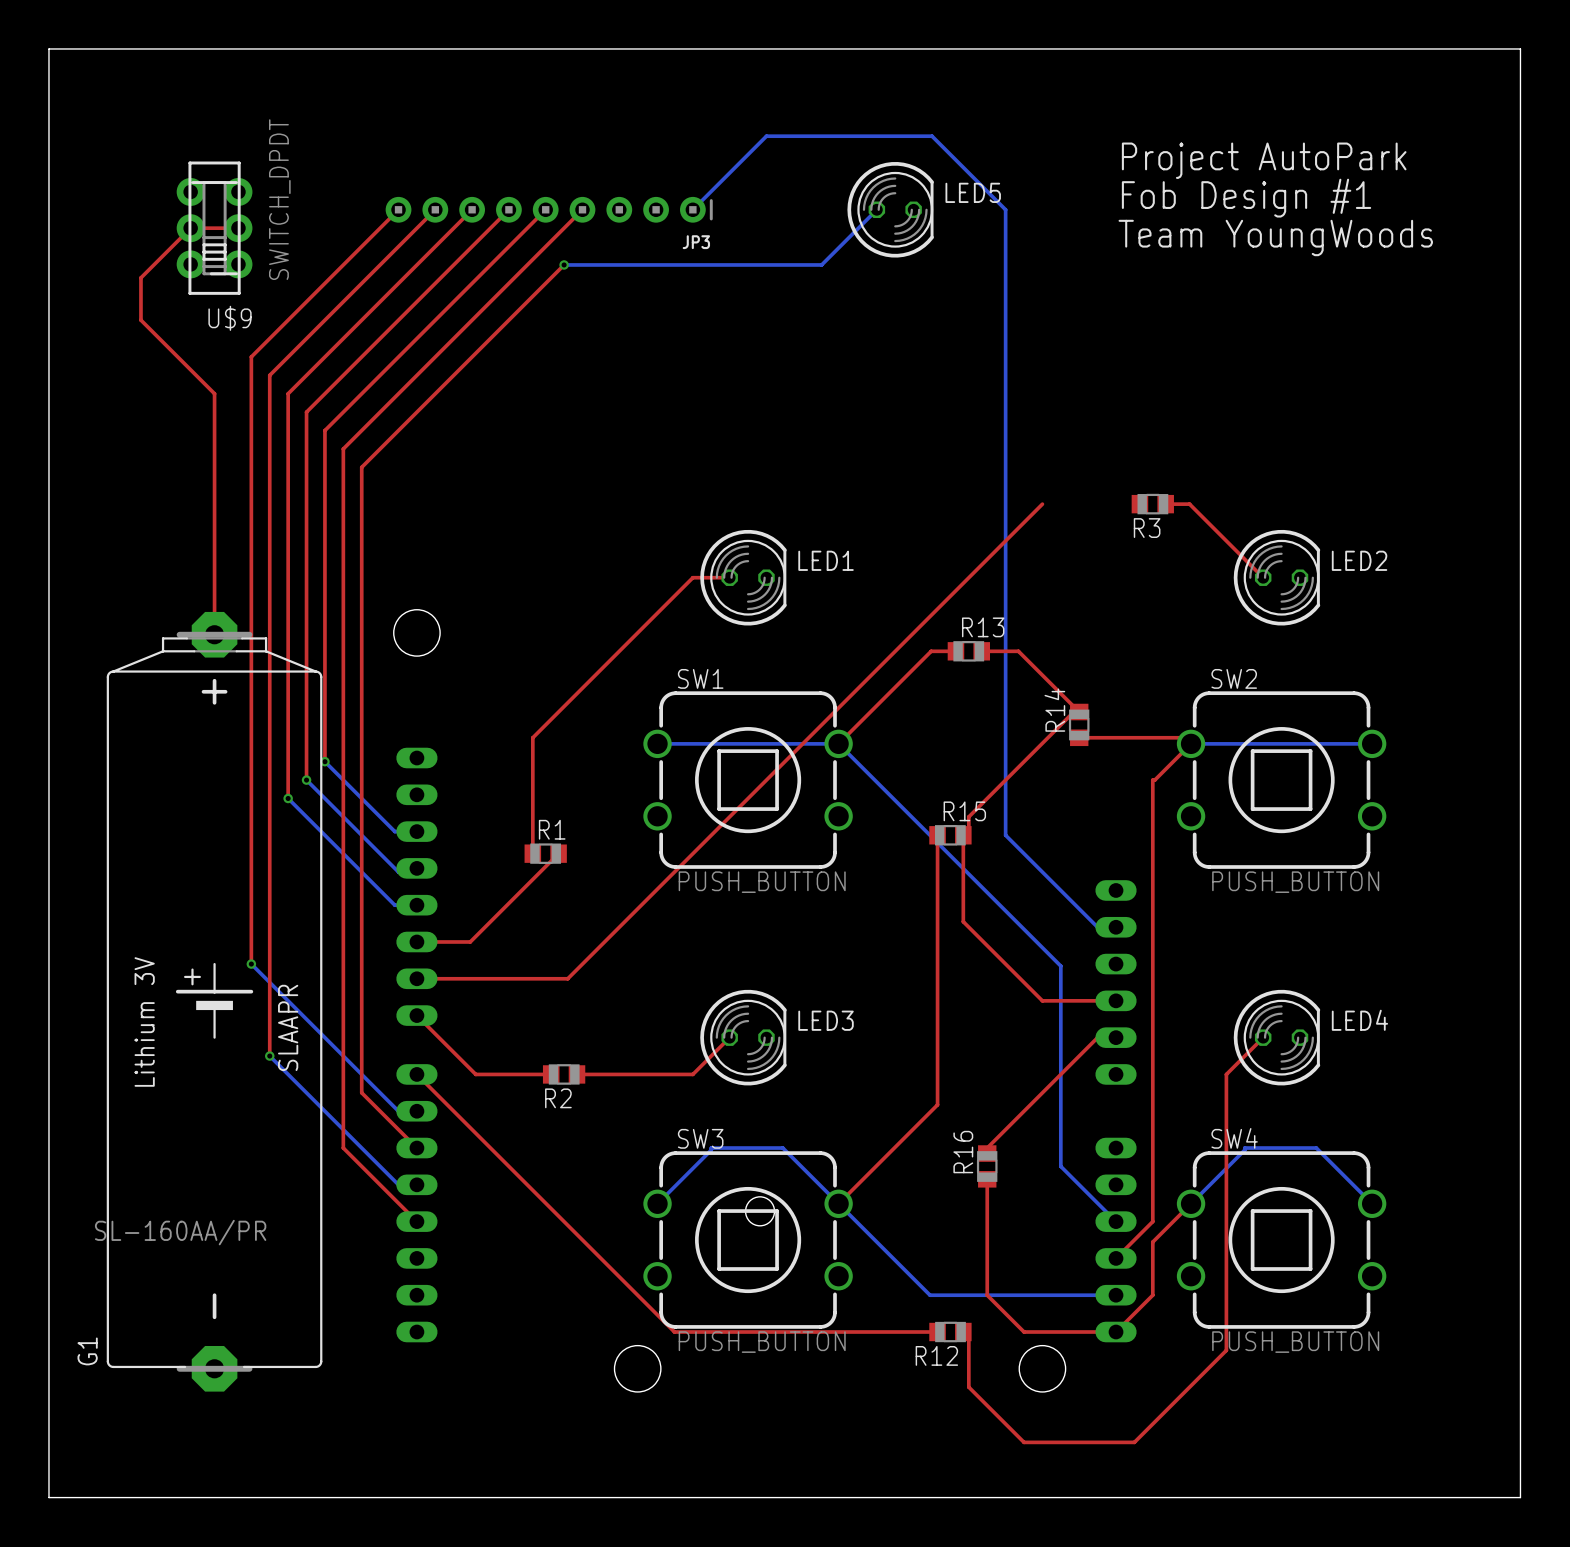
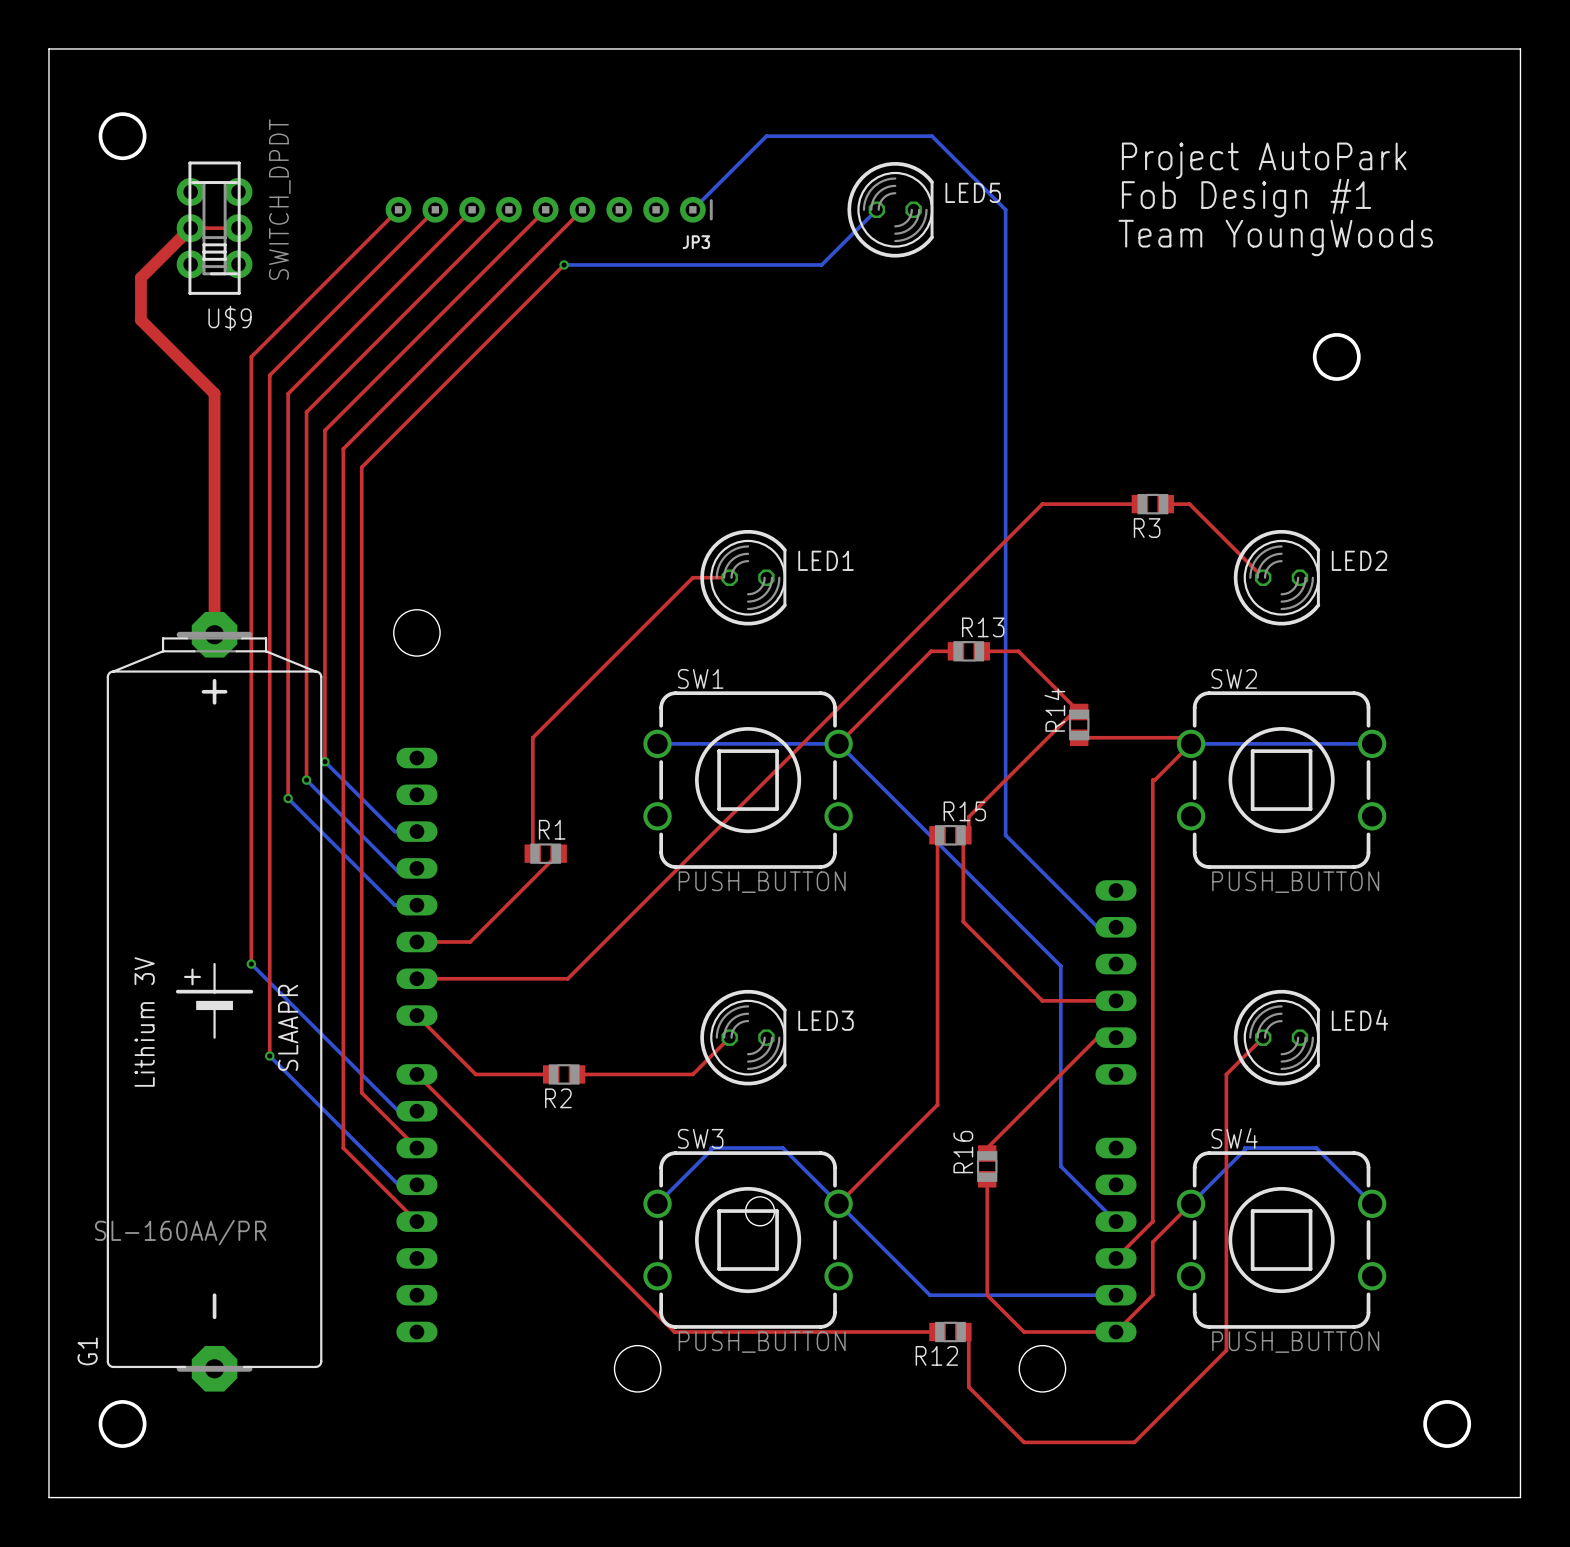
round board edge: none -> [98, 112, 147, 161]
top track width: thin (190, 228) (140, 277) (140, 320) (214, 393) (214, 634) -> thick (190, 228) (140, 277) (140, 320) (214, 393) (214, 634)
round board edge: none -> [1312, 333, 1361, 381]
top track: none -> (1042, 504) (1139, 504)
round board edge: none -> [98, 1400, 147, 1448]
round board edge: none -> [1423, 1400, 1472, 1448]

